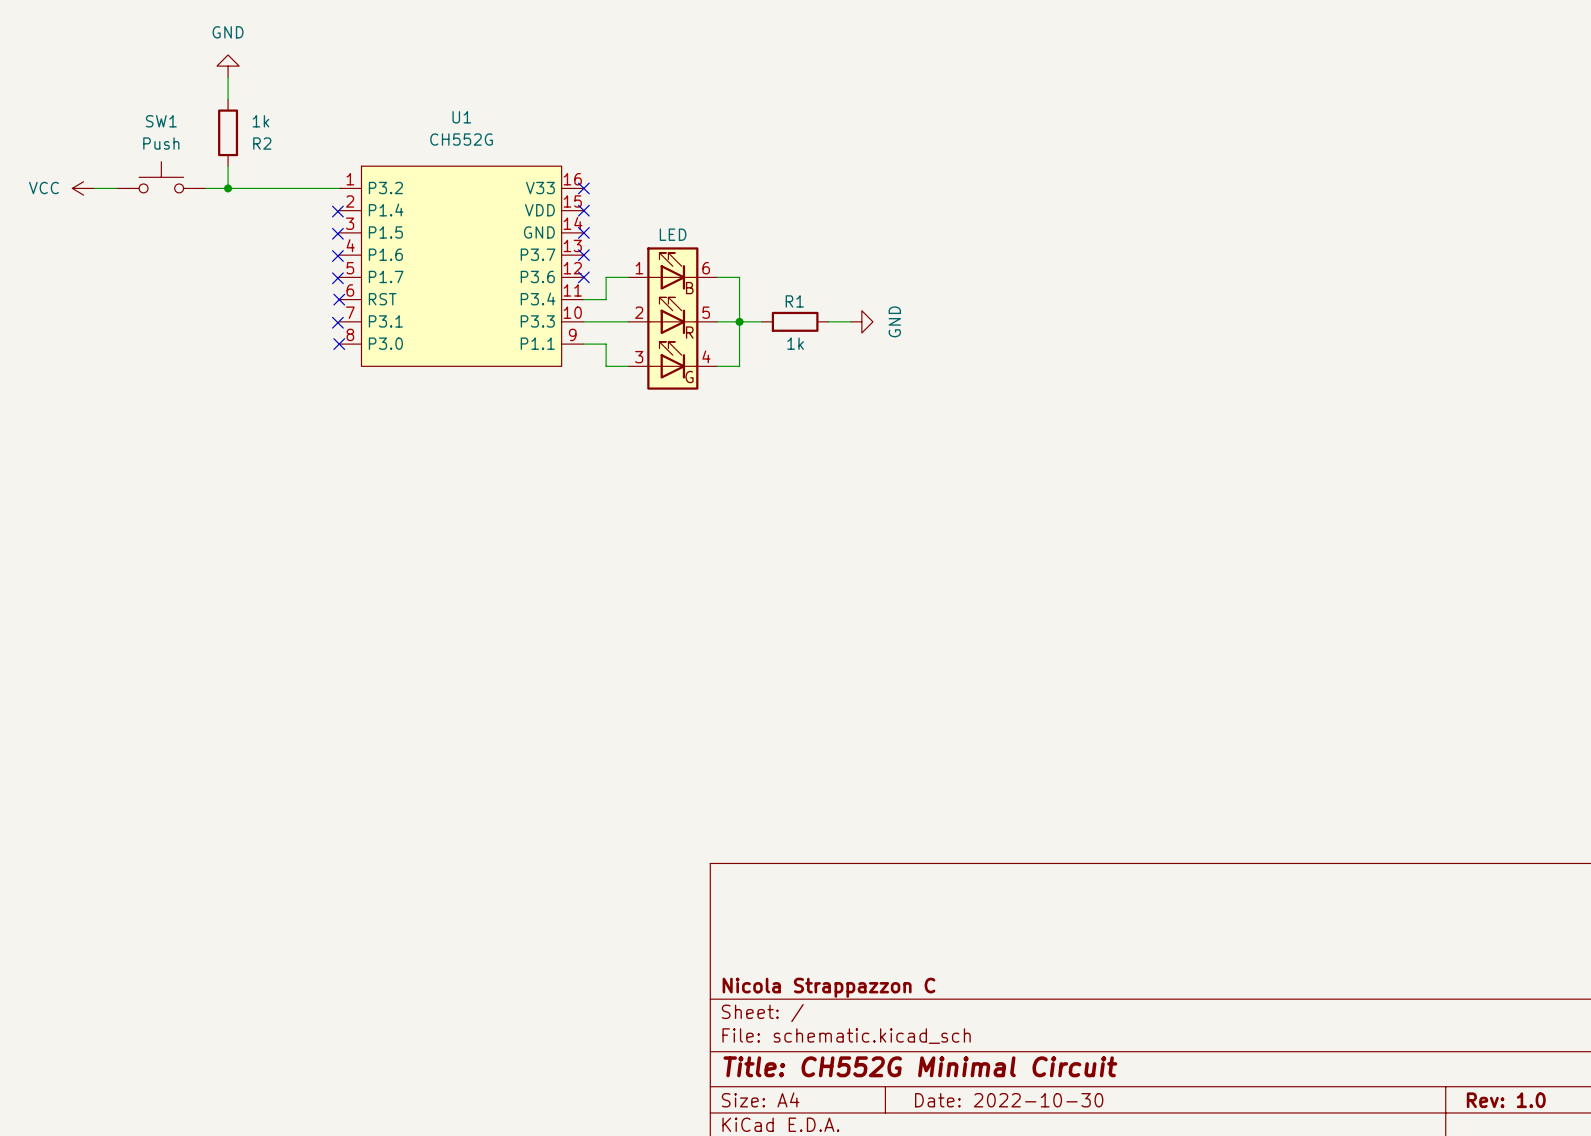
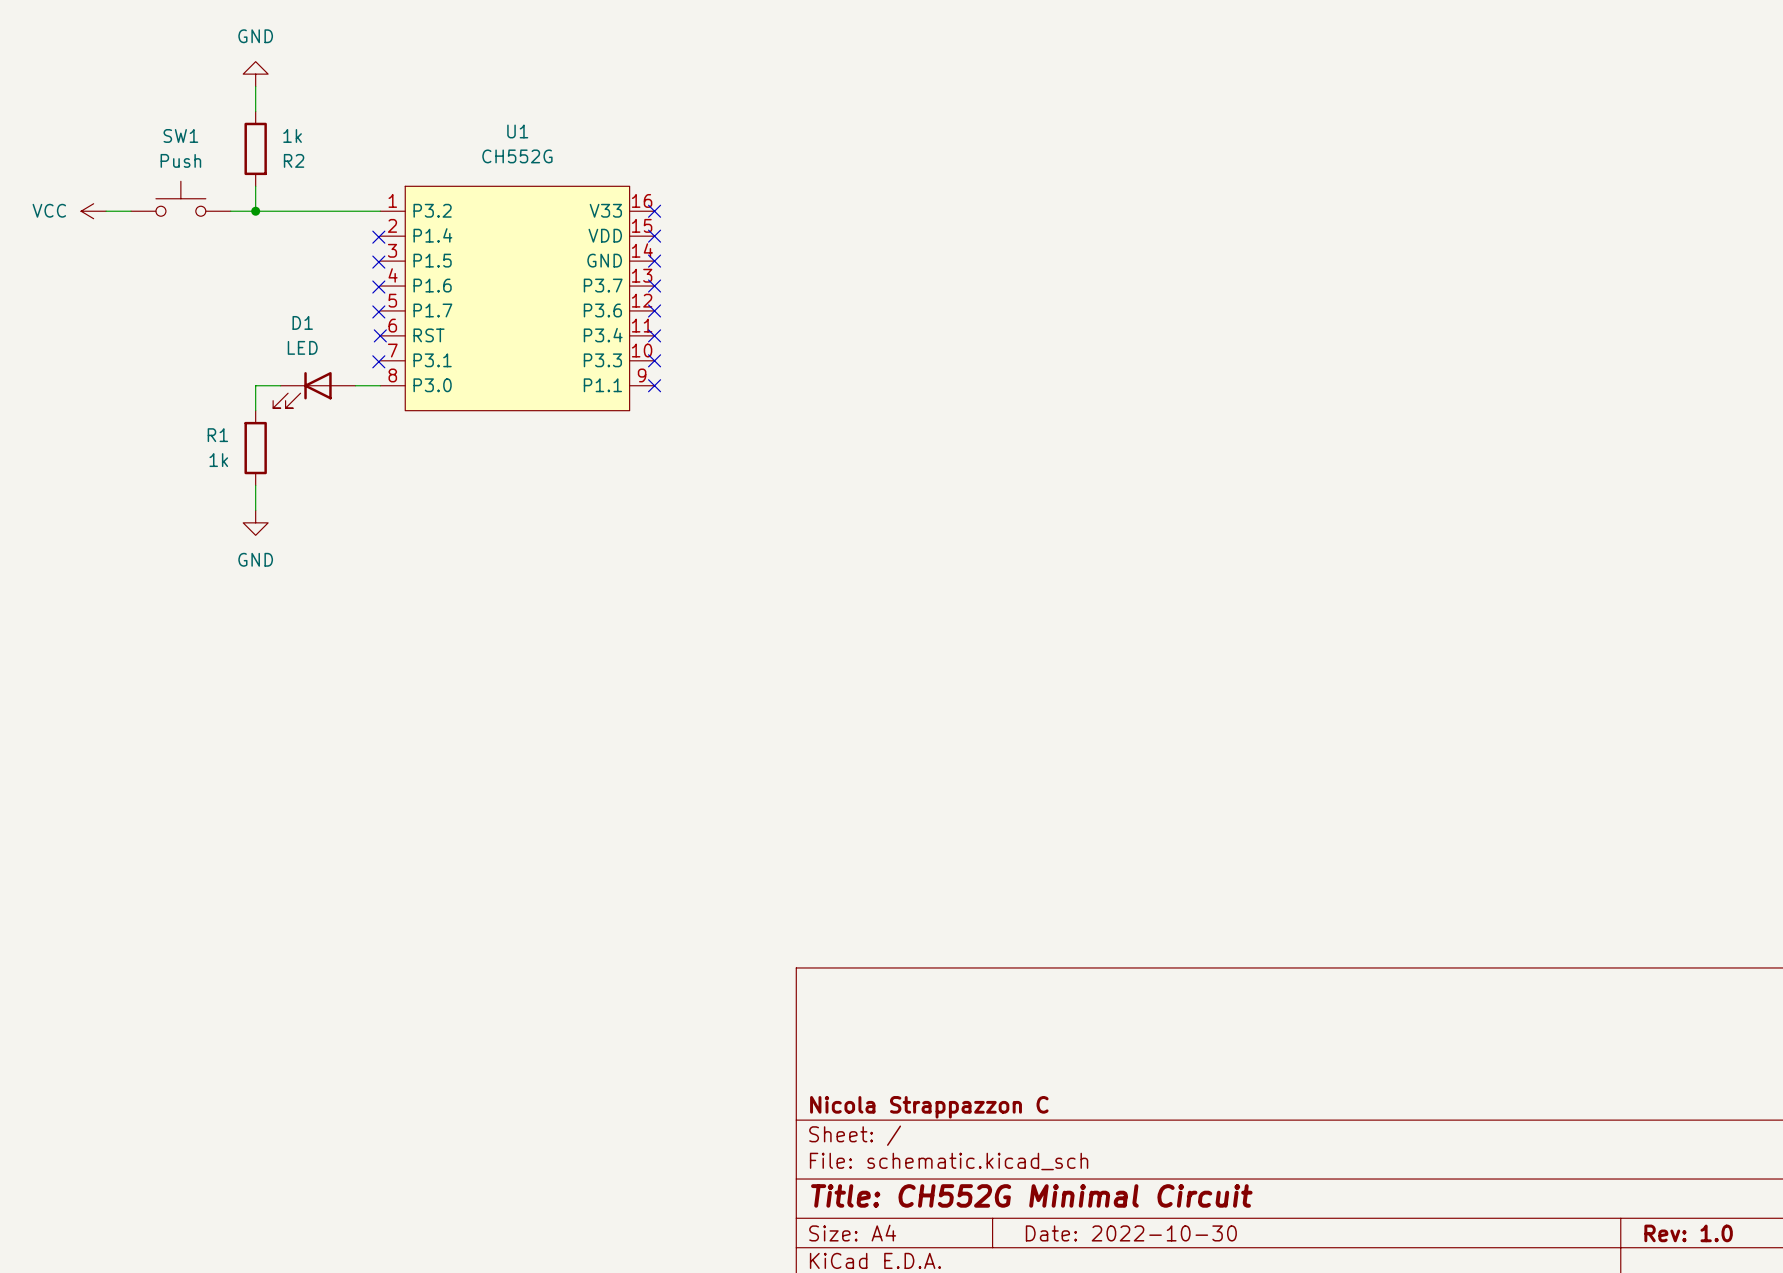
wire: (628, 277) (606, 277) (606, 299) (583, 299) -> none
wire: (717, 277) (739, 277) (739, 366) (717, 366) -> none
no-connect mark: none -> (654, 335)
R1 name position: R1 (794, 301) -> R1 (217, 435)
LED: (672, 318) -> none
wire: (583, 321) (628, 321) -> none
no-connect mark: none -> (654, 360)
wire: (717, 321) (761, 321) -> none
junction: (739, 321) -> none
R1 rotation: 0° (795, 321) -> 90° clockwise (255, 448)
R1 position: (795, 321) -> (255, 448)
wire: (828, 321) (850, 321) -> none
power symbol: GND (861, 321) -> none
R1 value position: 1k (795, 343) -> 1k (218, 460)
wire: none -> (280, 385) (255, 385) (255, 410)
wire: none -> (355, 385) (380, 385)
no-connect mark: (339, 344) -> none
wire: (583, 344) (606, 344) (606, 366) (628, 366) -> none
no-connect mark: none -> (654, 385)
D1: none -> LED (314, 390)
wire: none -> (255, 485) (255, 510)
power symbol: none -> GND (255, 522)

